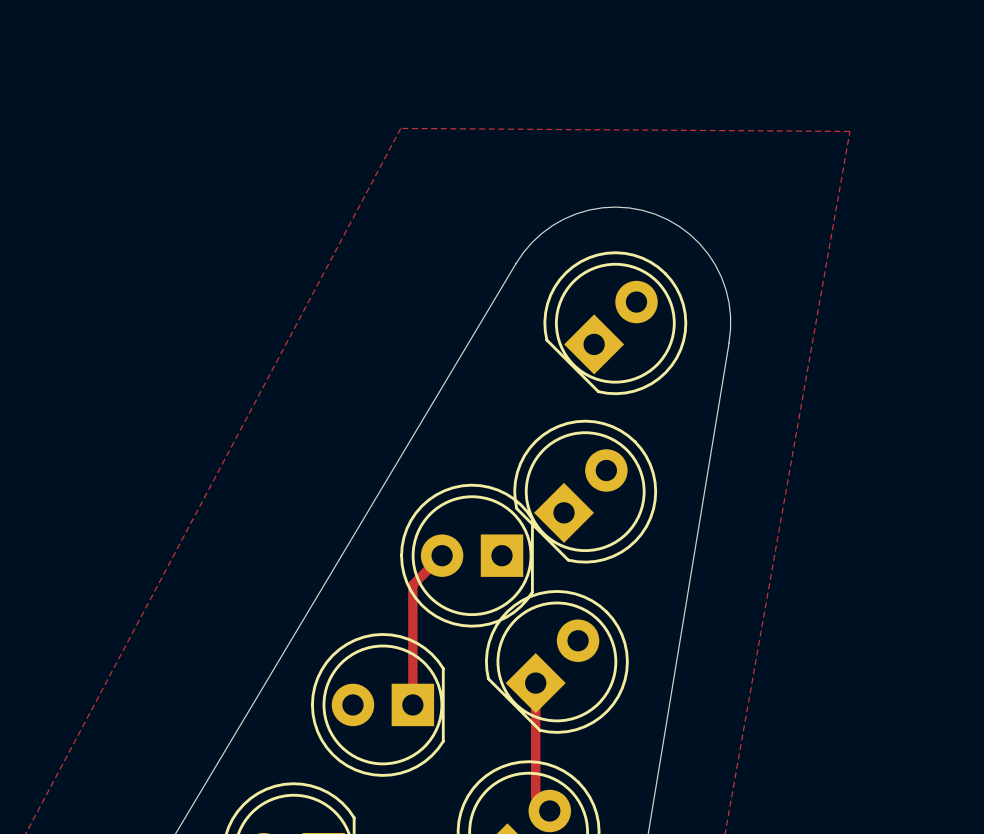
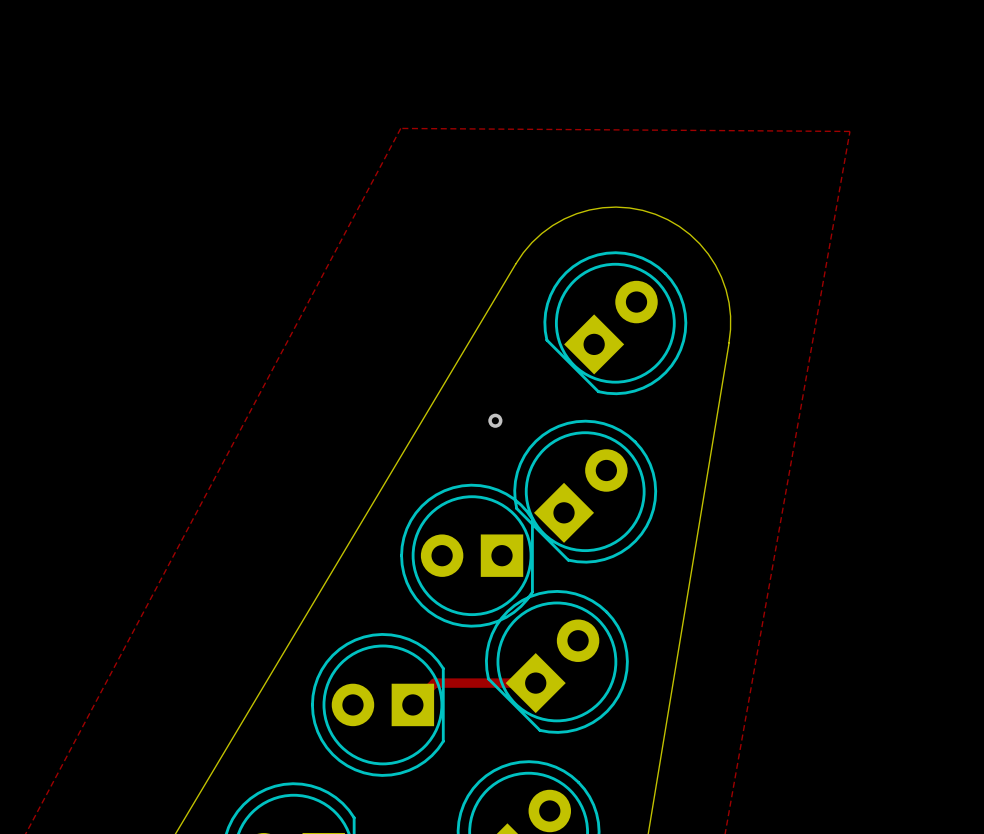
via: none -> (495, 420)
track: (442, 555) (412, 584) (412, 704) -> (535, 683) (434, 683) (412, 704)
track: (535, 683) (535, 796) (549, 811) -> none

